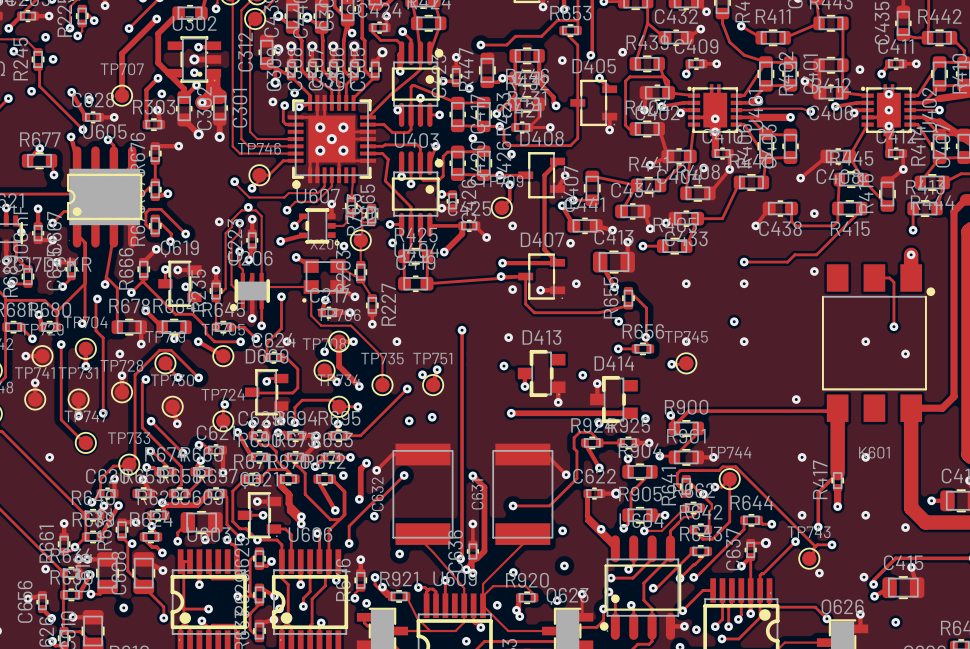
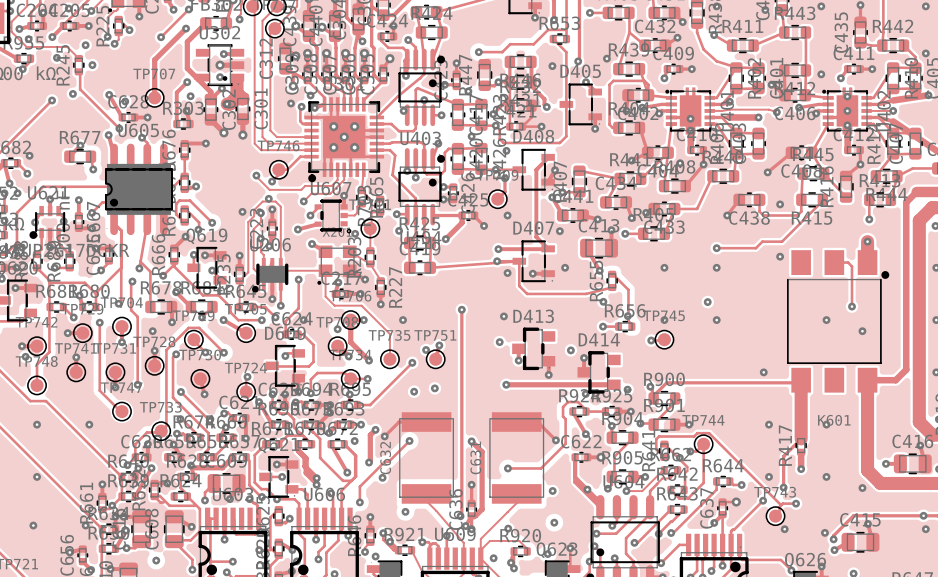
via: (151, 526) -> none
track: none -> (155, 496) (159, 496) (169, 505) (194, 505)
track: none -> (187, 496) (199, 508) (199, 531) (190, 540) (175, 540)
track: (143, 538) (152, 547) (156, 547) (162, 552) -> none
via: (132, 543) -> none
track: (127, 545) (127, 570) (143, 586) -> none
via: (162, 552) -> none

